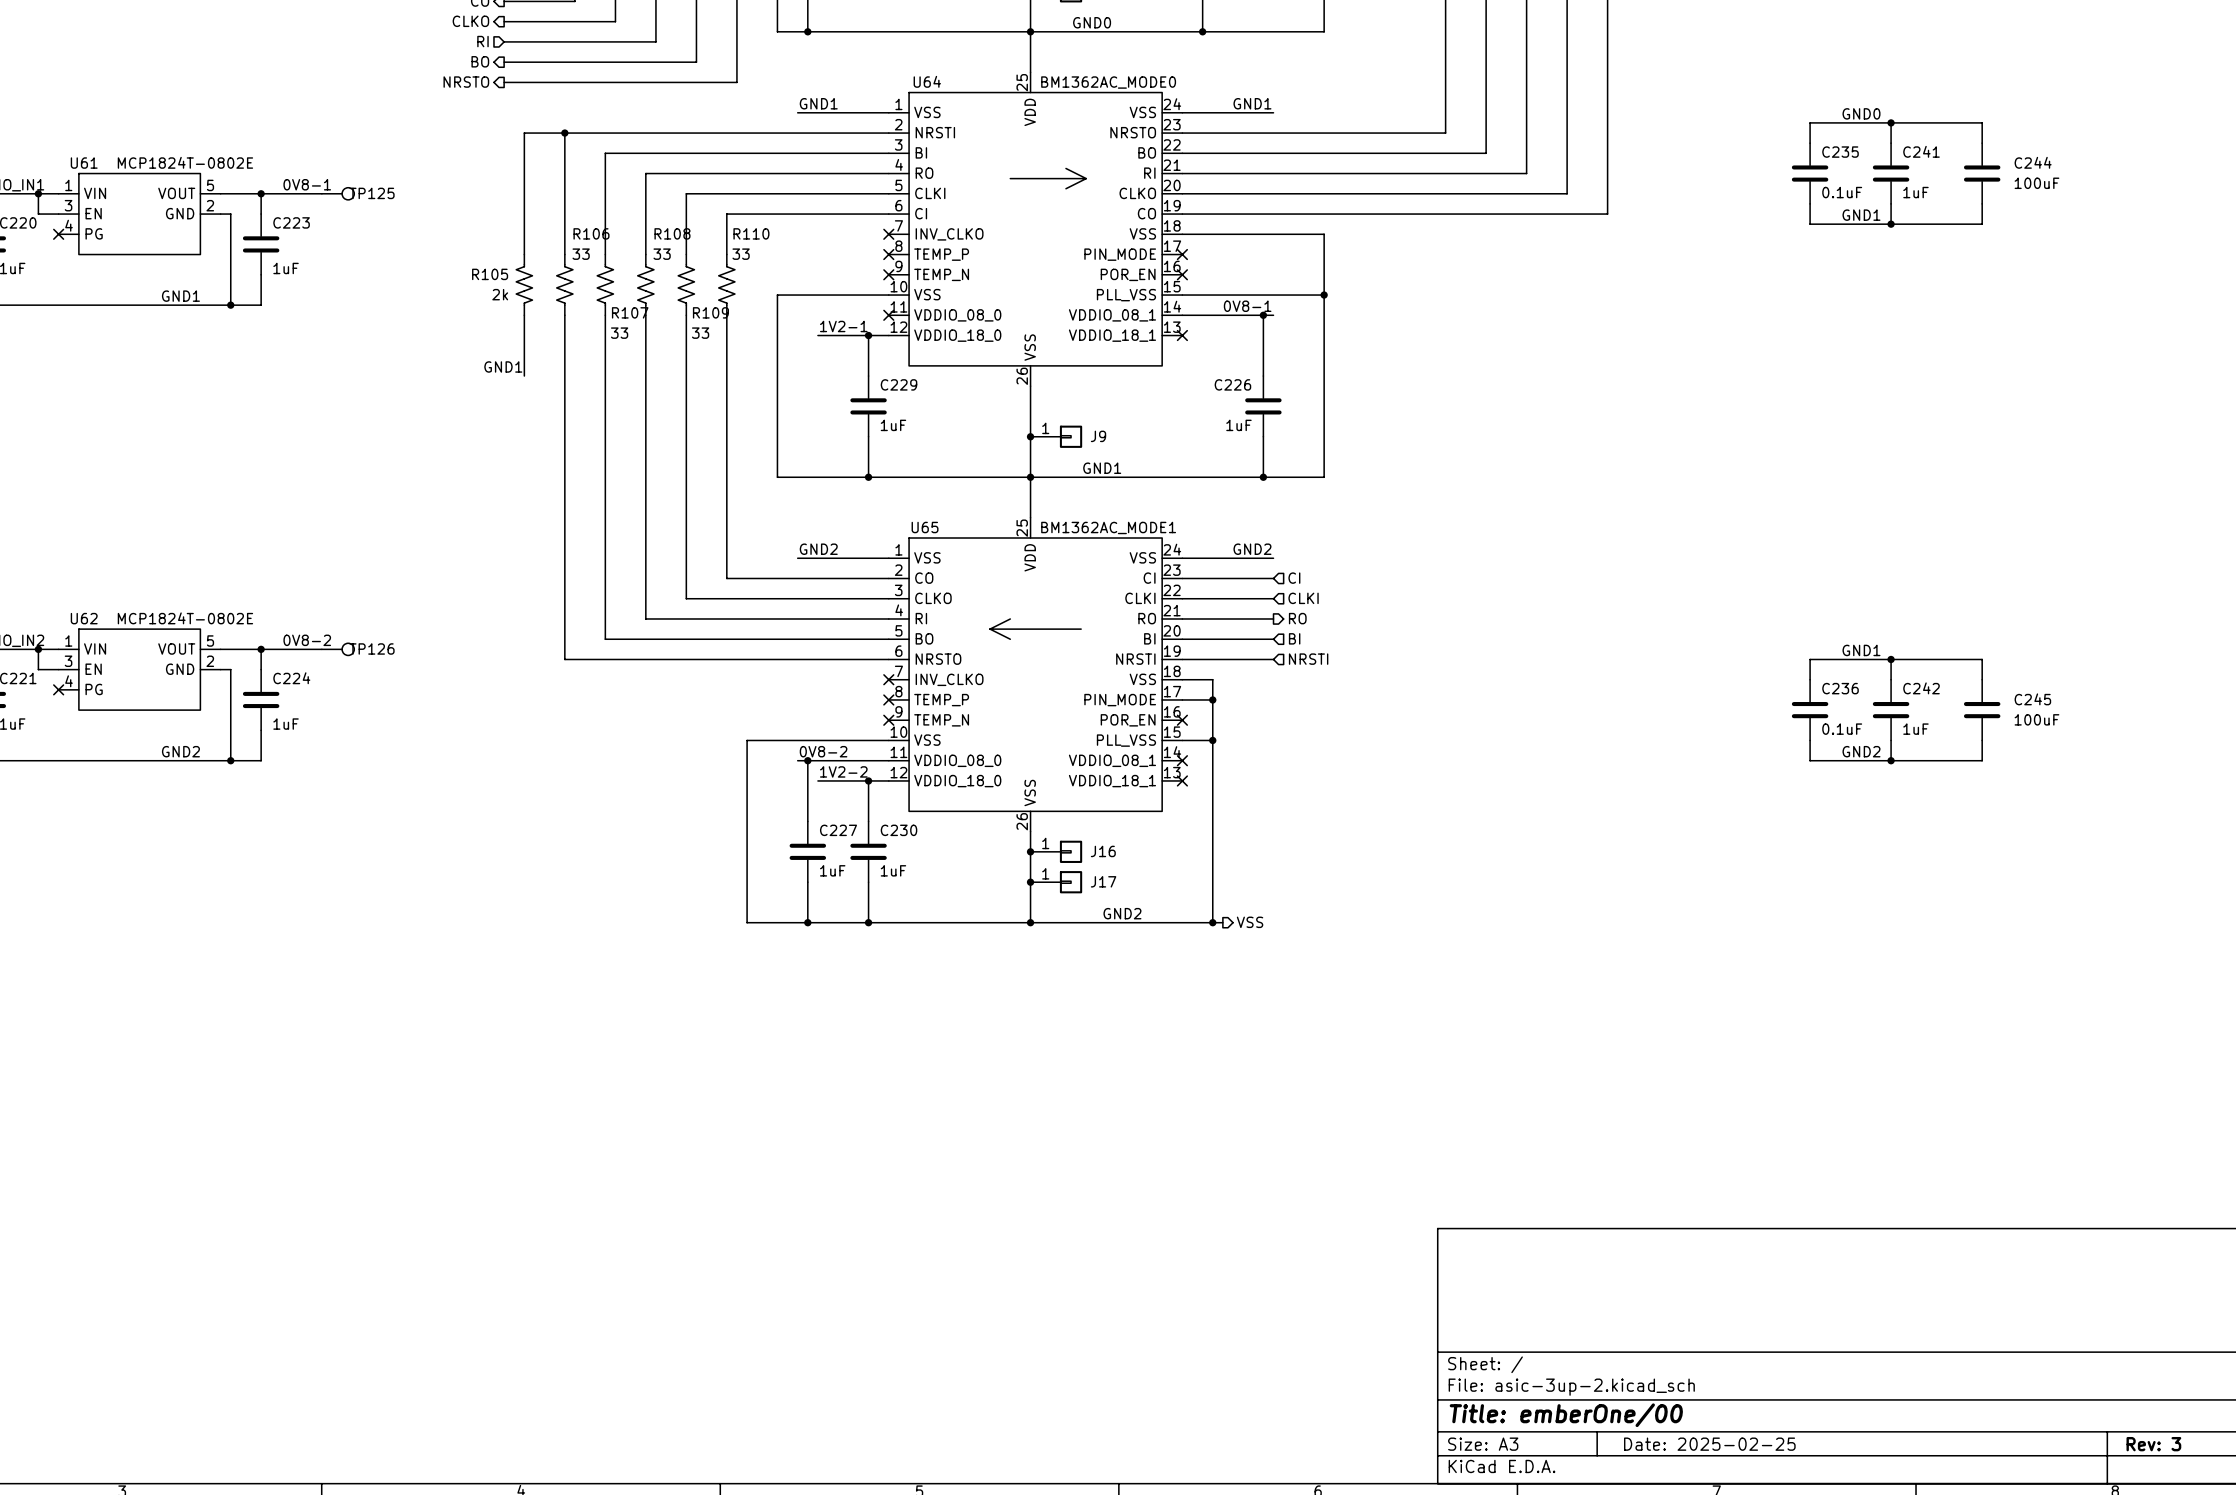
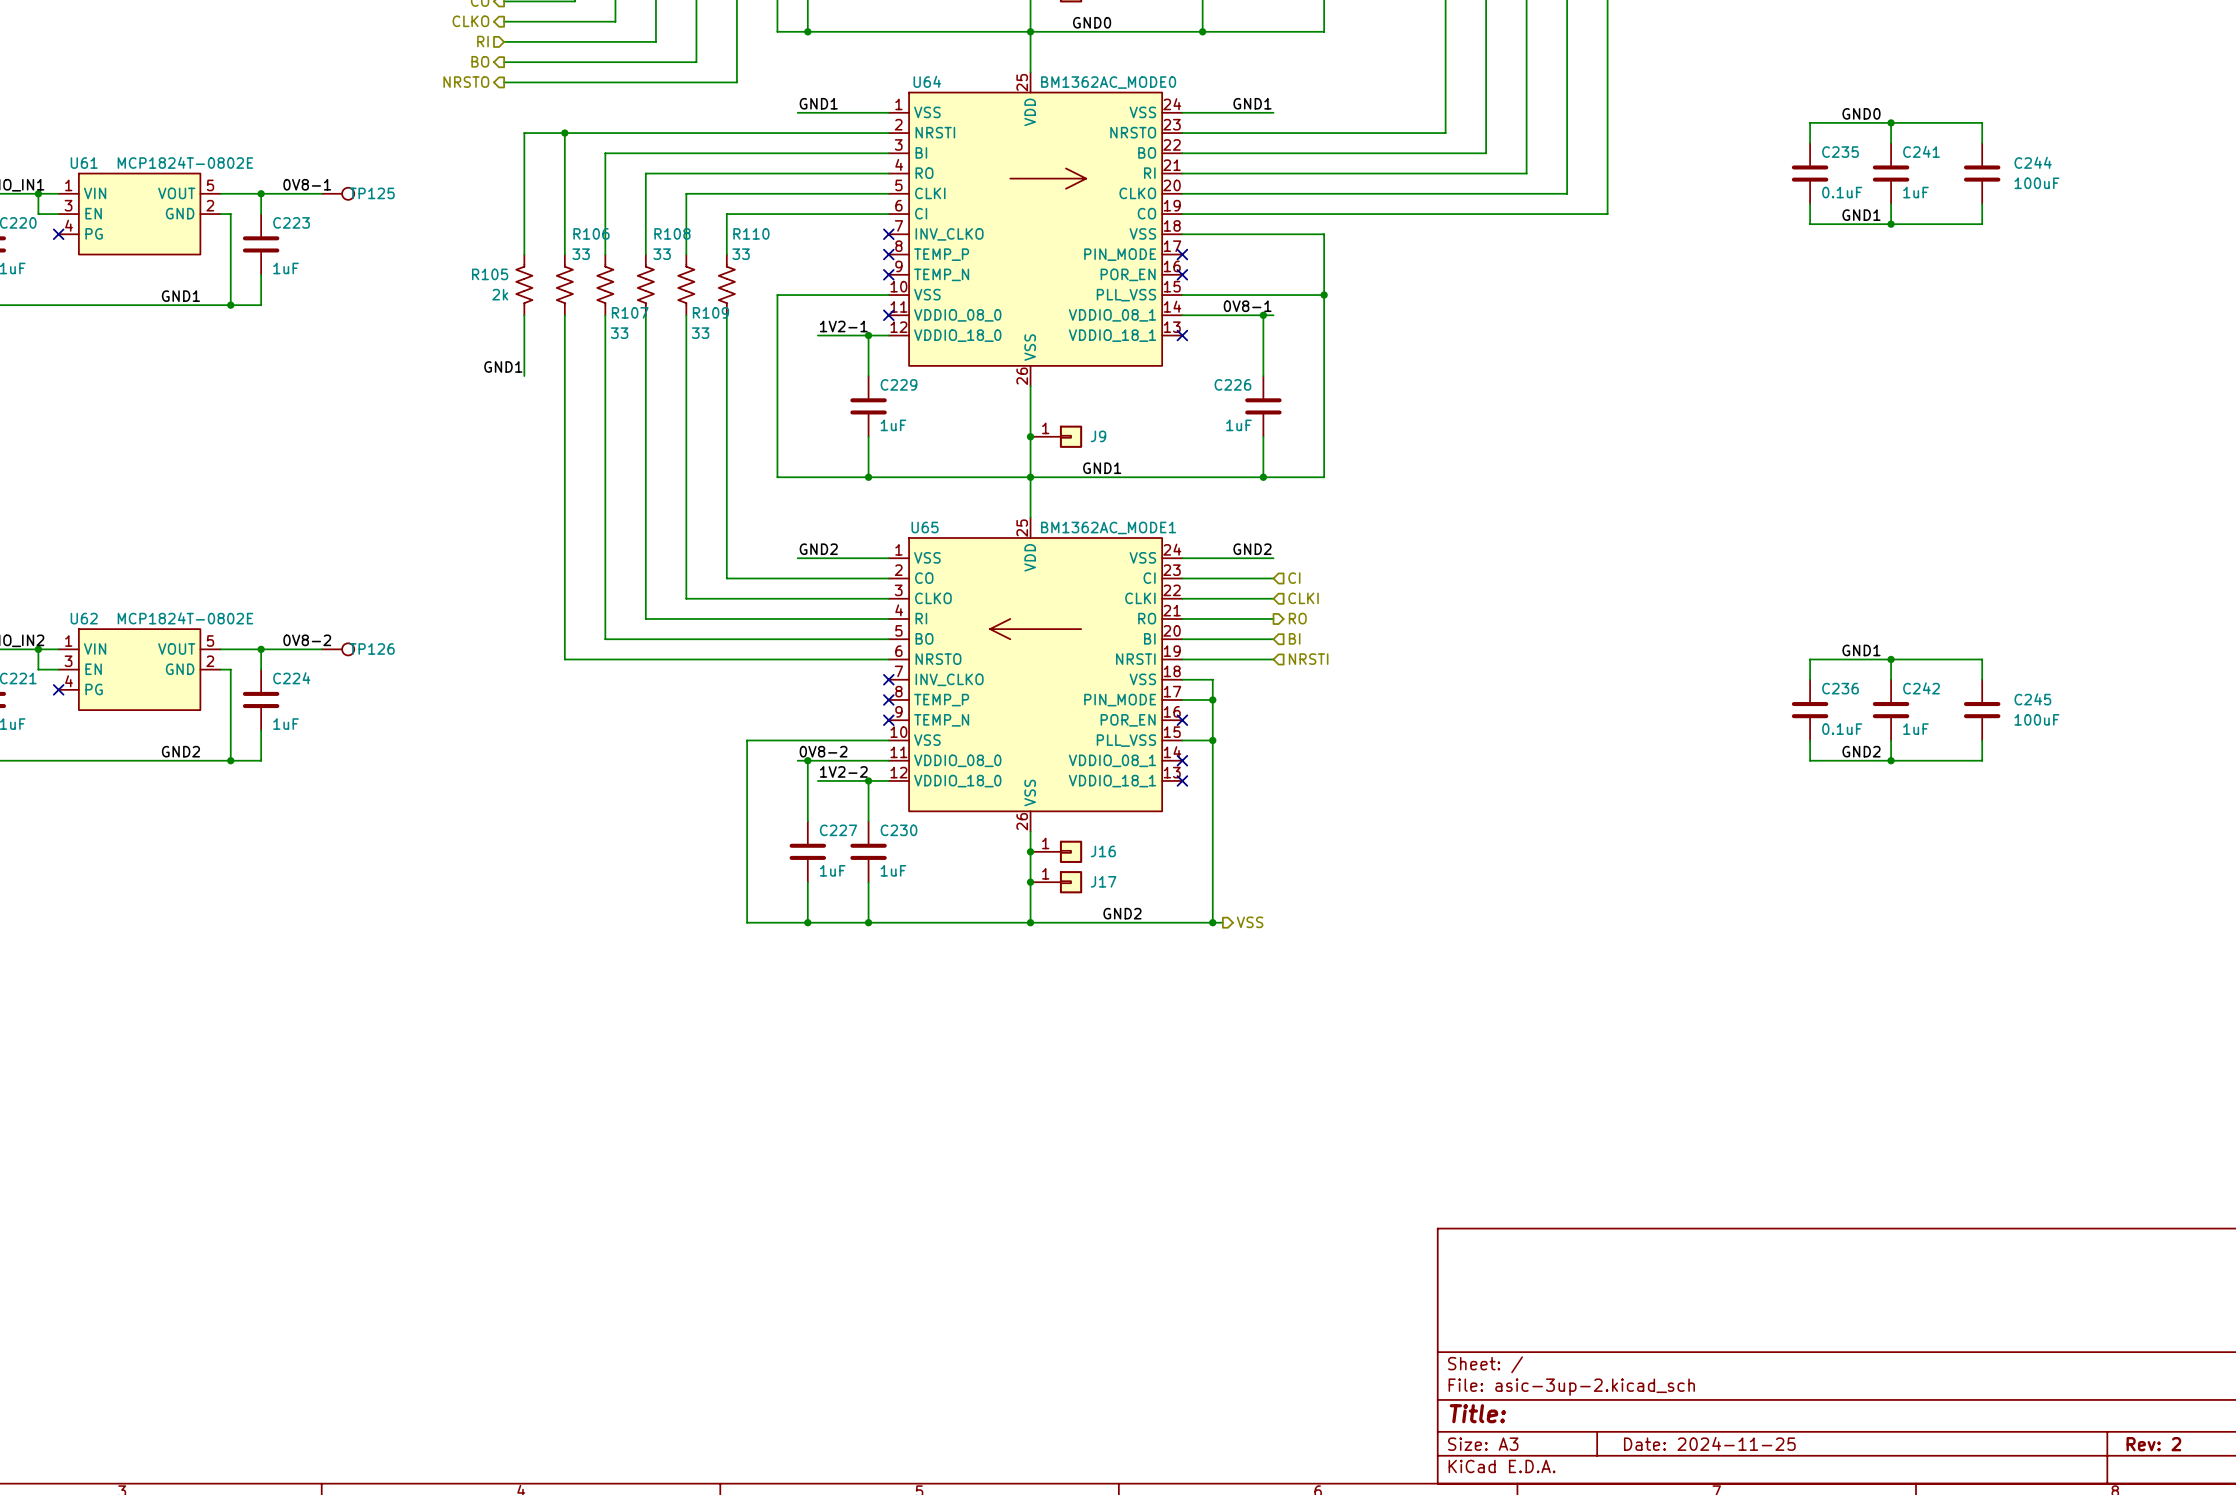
title block: Title: emberOne/00 (1566, 1415) -> Title: (1477, 1413)
title block: Date: 2025-02-25 (1709, 1444) -> Date: 2024-11-25 (1709, 1443)
title block: Rev: 3 (2153, 1444) -> Rev: 2 (2153, 1444)

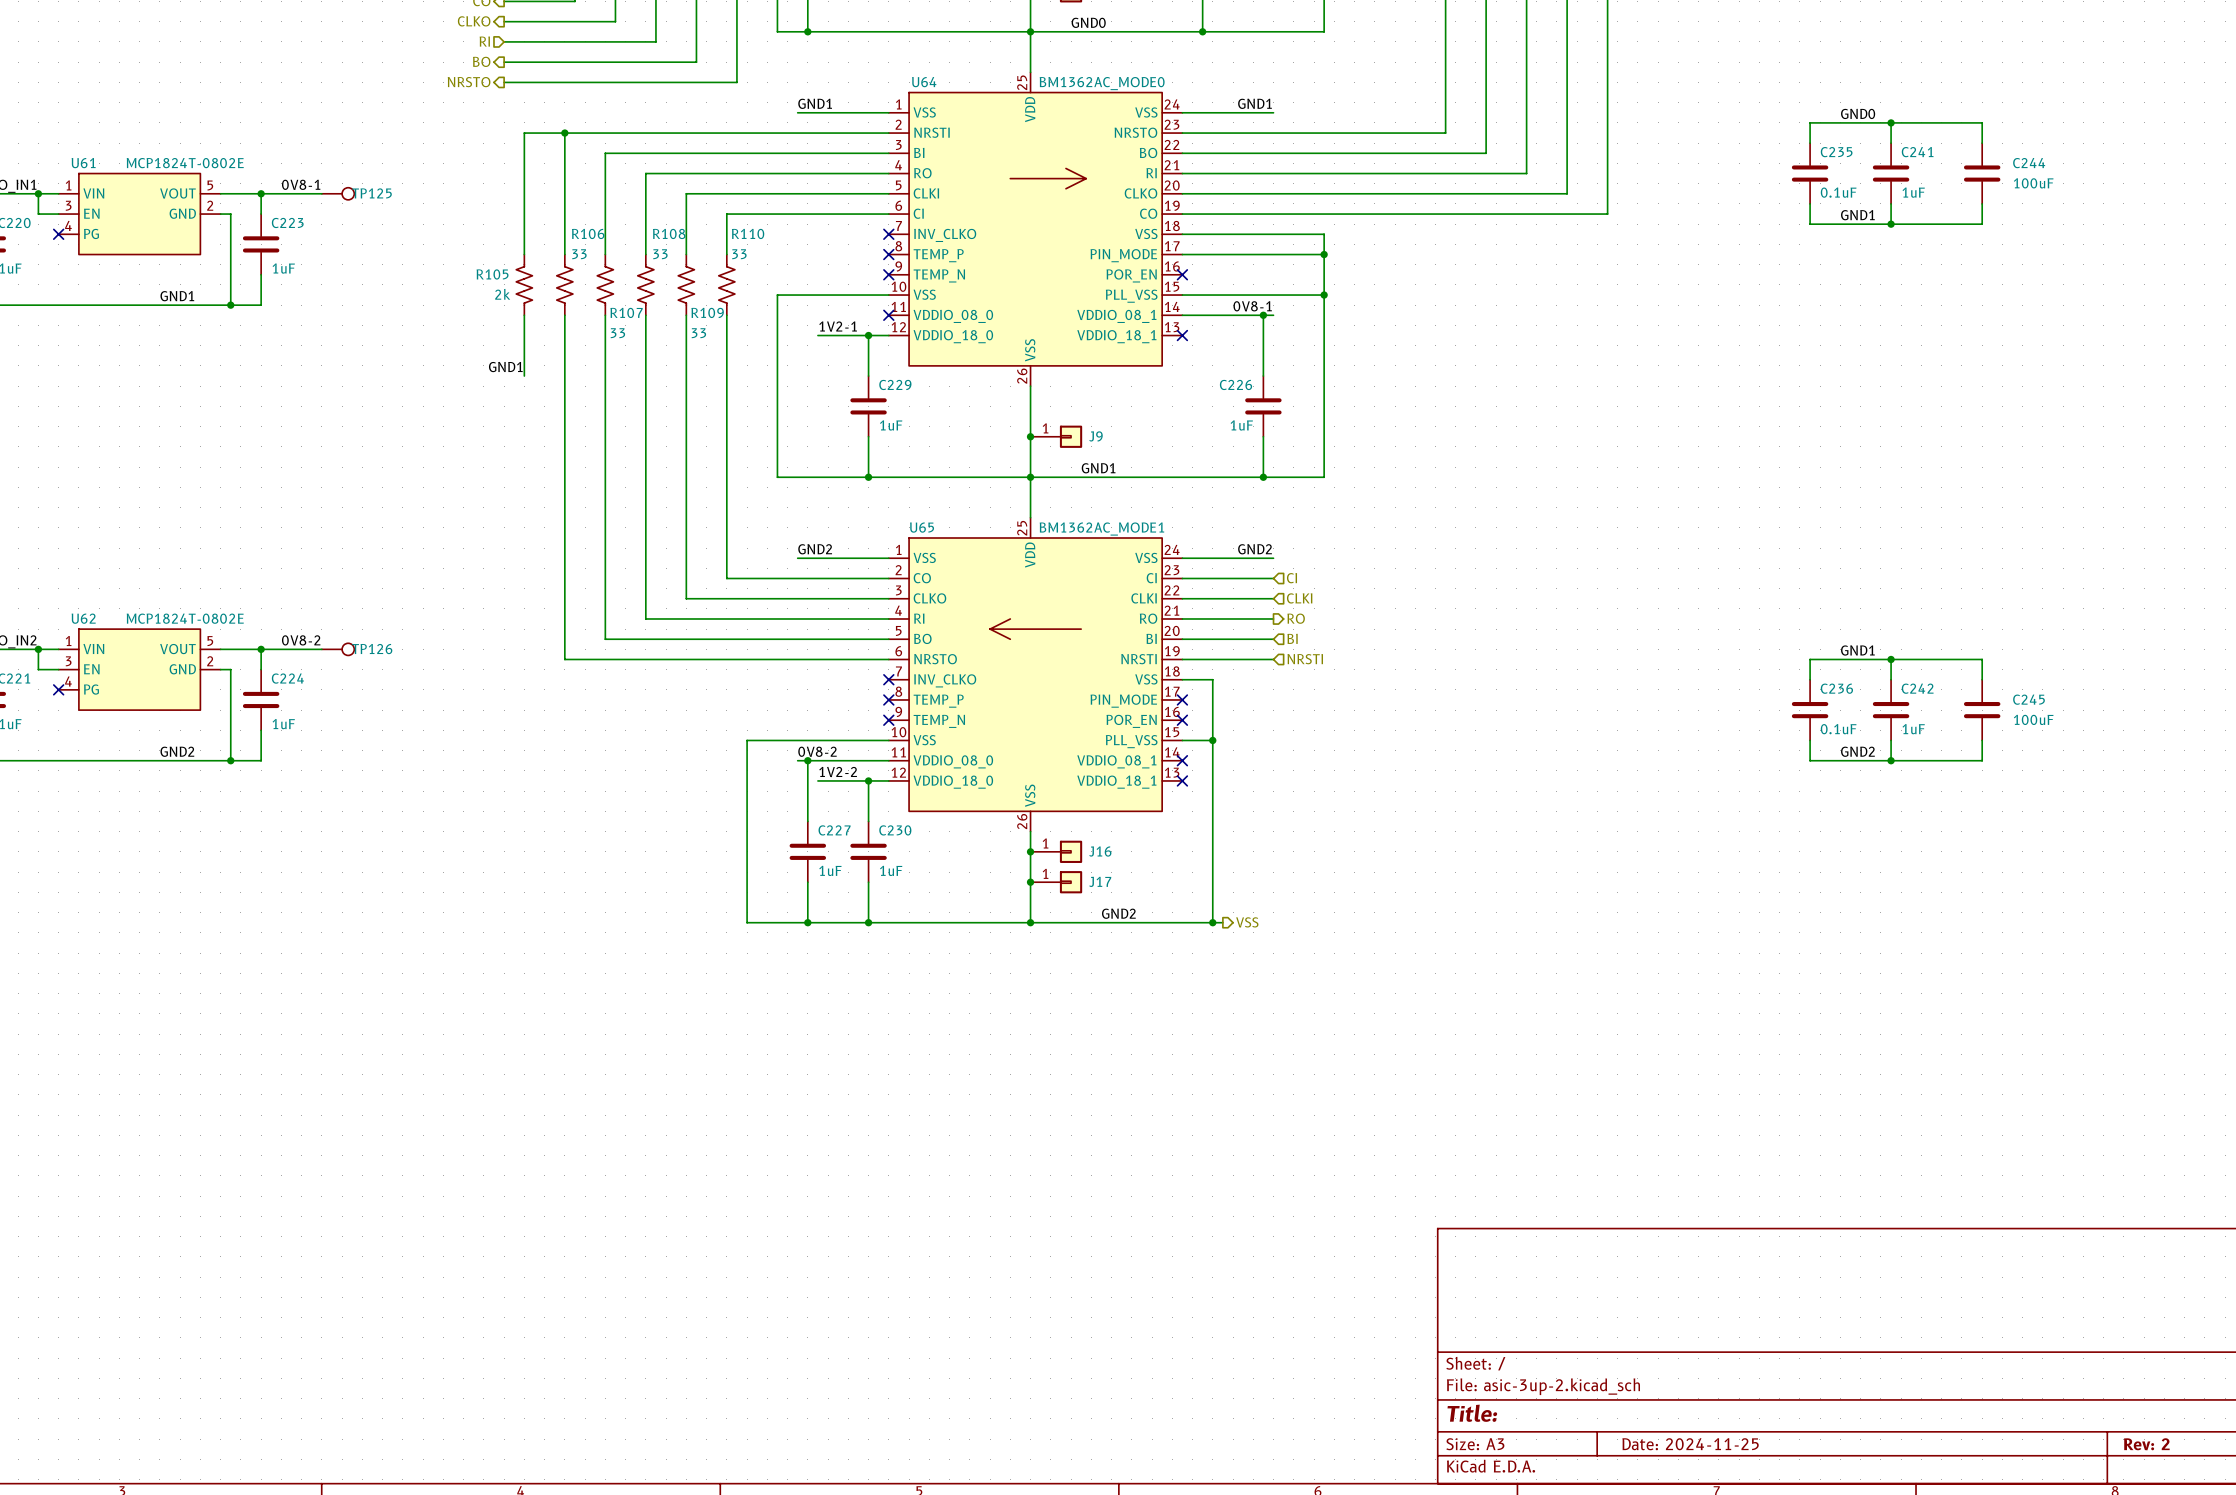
wire: none -> (1182, 254) (1324, 254)
no-connect mark: (1182, 254) -> none
junction: none -> (1324, 254)
wire: (1182, 699) (1212, 699) -> none
no-connect mark: none -> (1182, 699)
junction: (1212, 699) -> none

